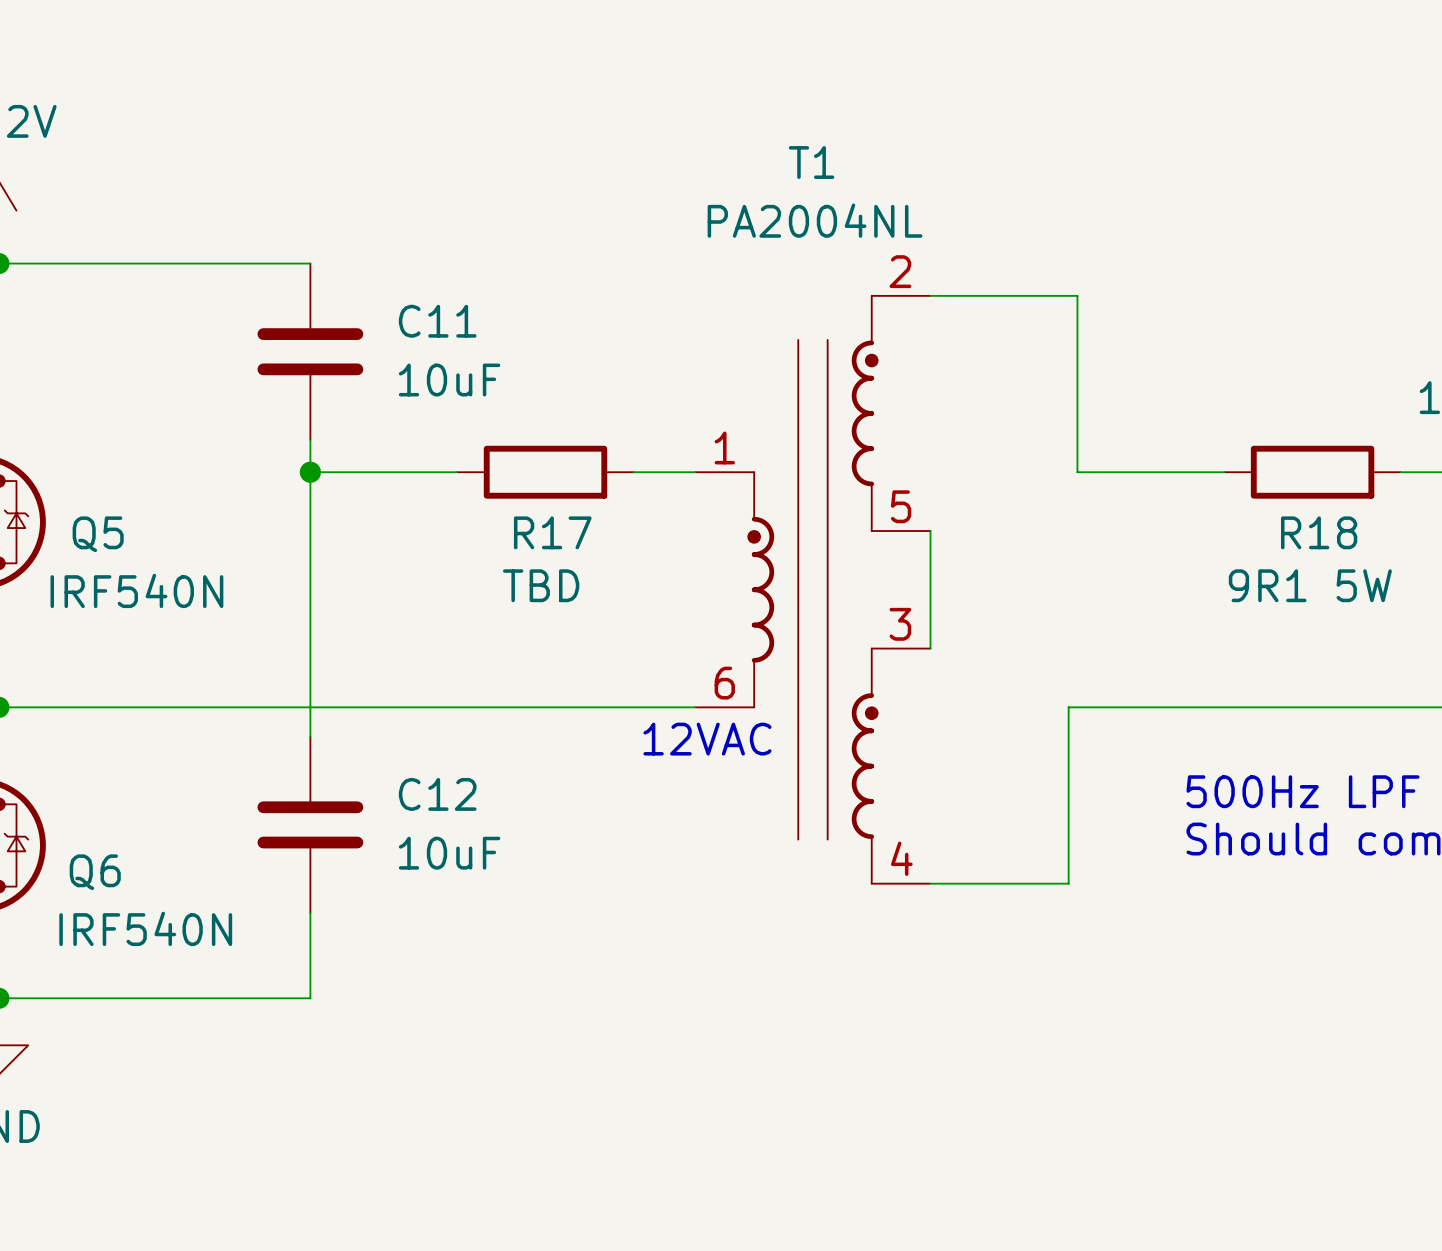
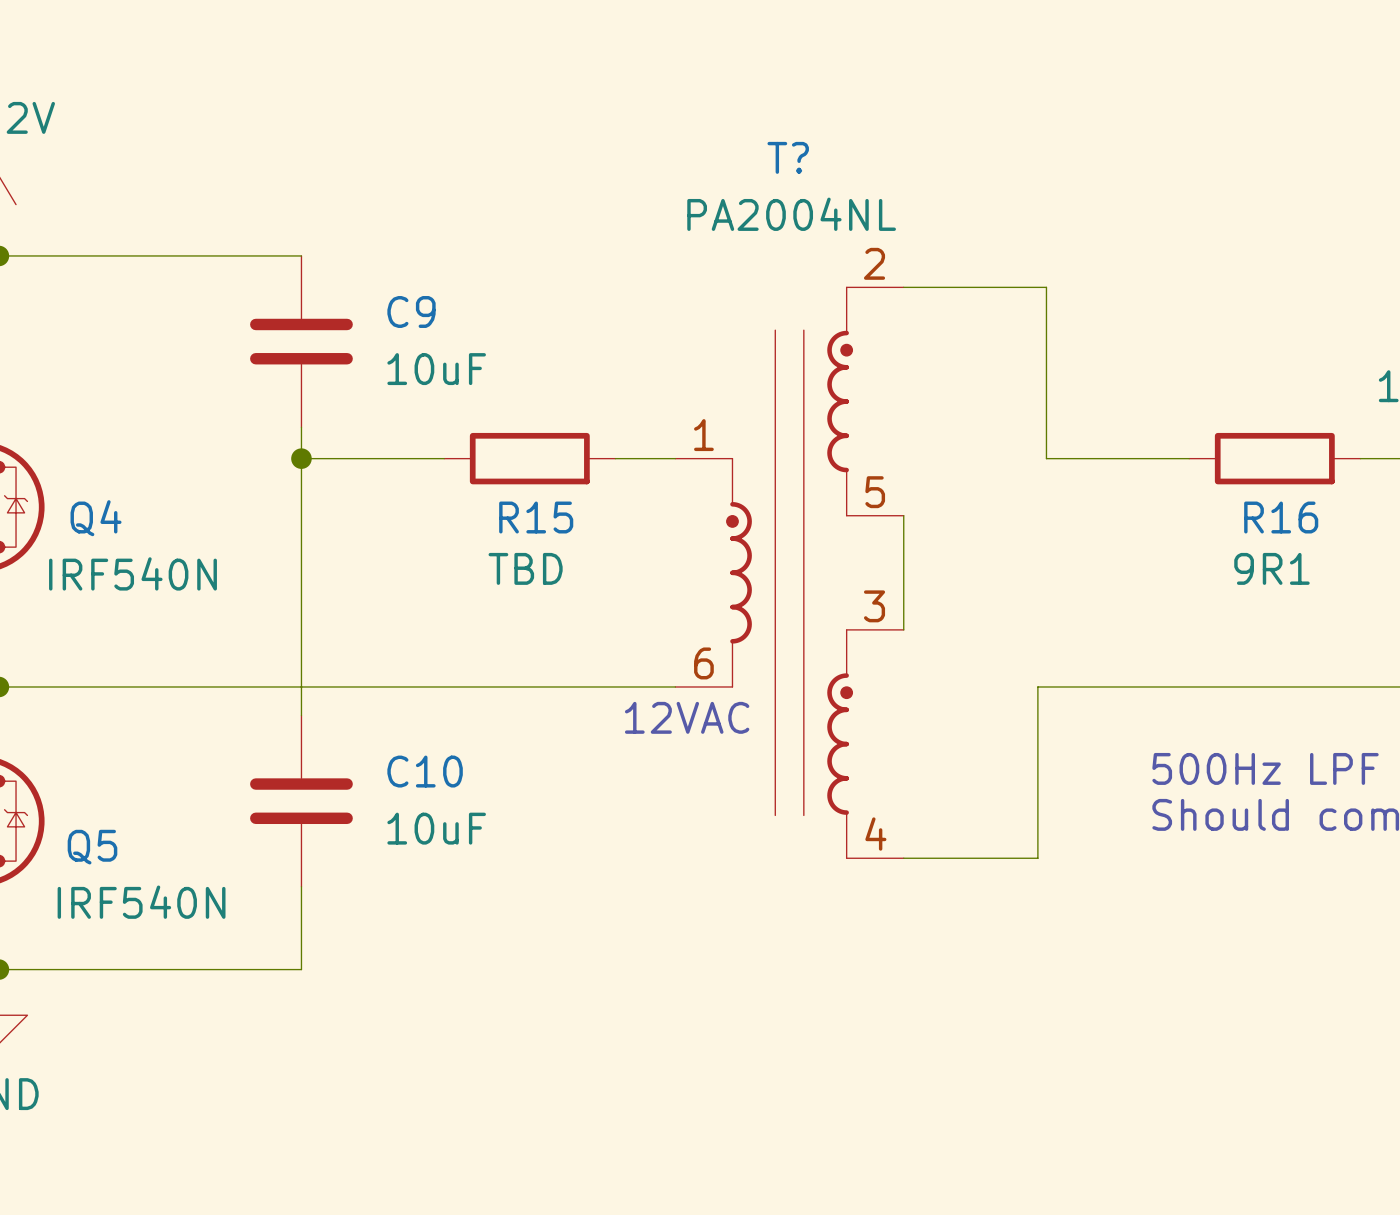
T1 name: T1 (811, 162) -> T? (788, 157)
C11 name: C11 (437, 321) -> C9 (411, 311)
R17 name: R17 (552, 532) -> R15 (536, 517)
R18 name: R18 (1319, 532) -> R16 (1281, 517)
Q5 name: Q5 (98, 534) -> Q4 (96, 518)
R18 value: 9R1 5W (1310, 585) -> 9R1 (1271, 568)
C12 name: C12 (437, 794) -> C10 (425, 771)
Q6 name: Q6 (95, 872) -> Q5 (92, 847)

